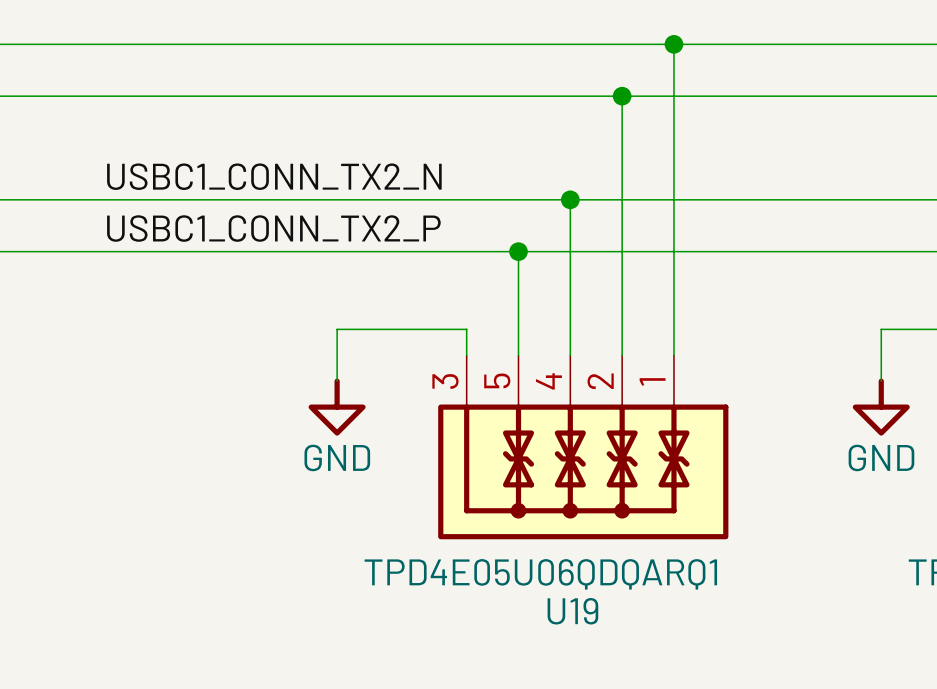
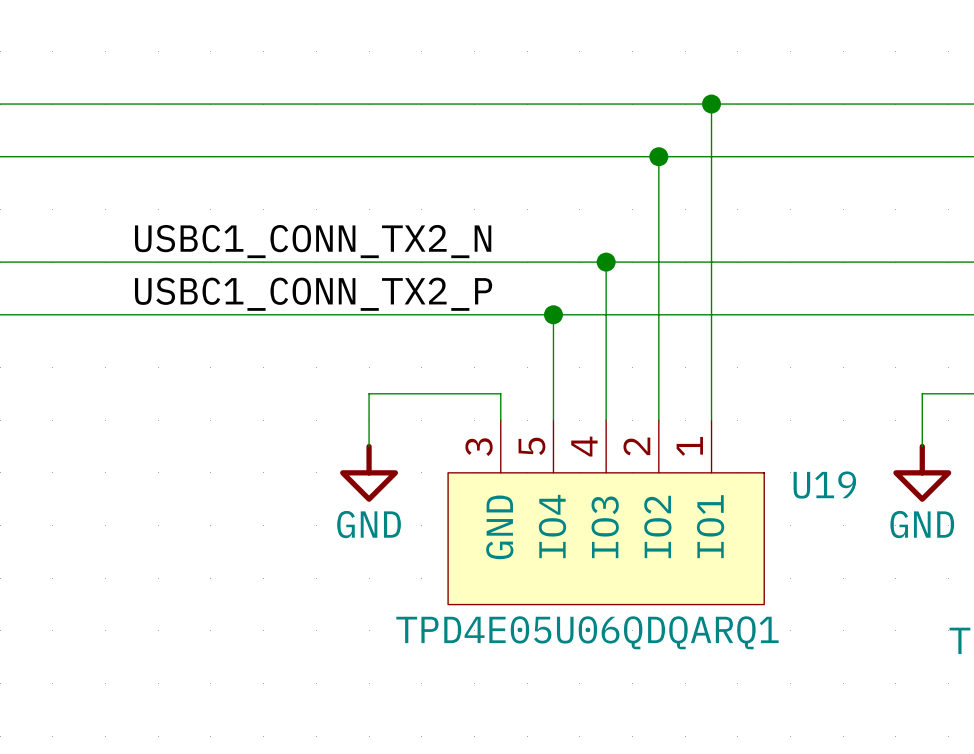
U19 symbol: [438, 355, 729, 540] -> [448, 420, 765, 605]
U19 text: none -> TPD4E05U06QDQARQ1 (587, 632)
U19 value: TPD4E05U06QDQARQ1 (540, 574) -> none
U19 name position: U19 (572, 611) -> U19 (824, 485)

